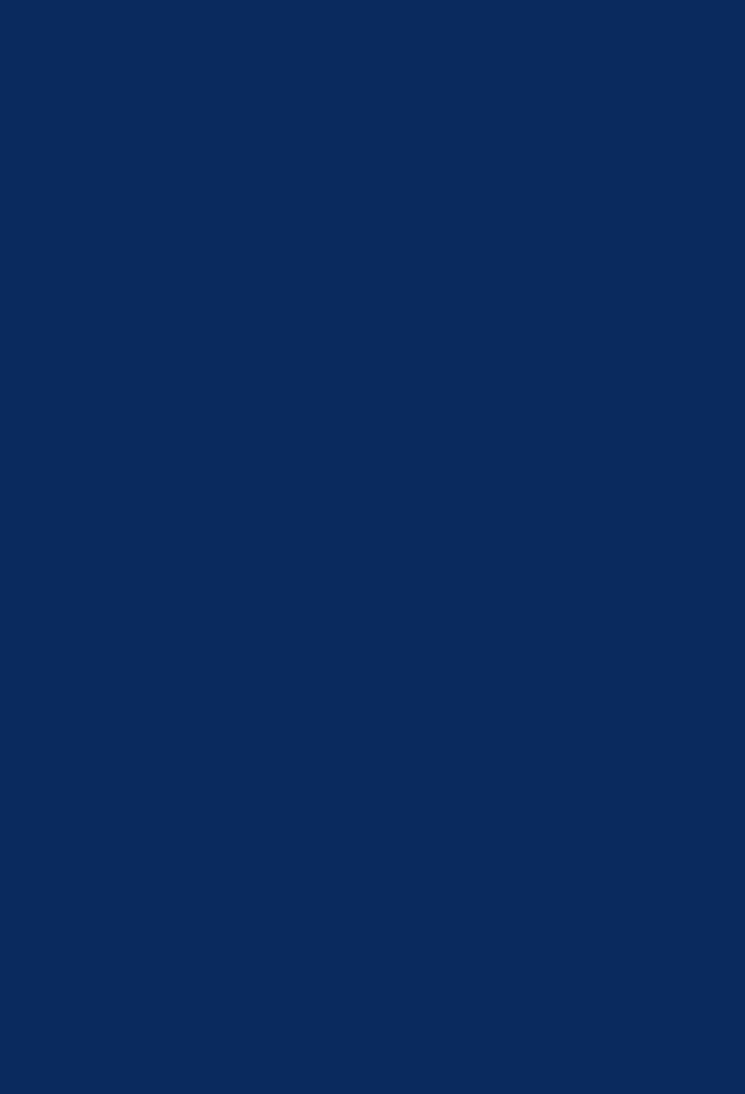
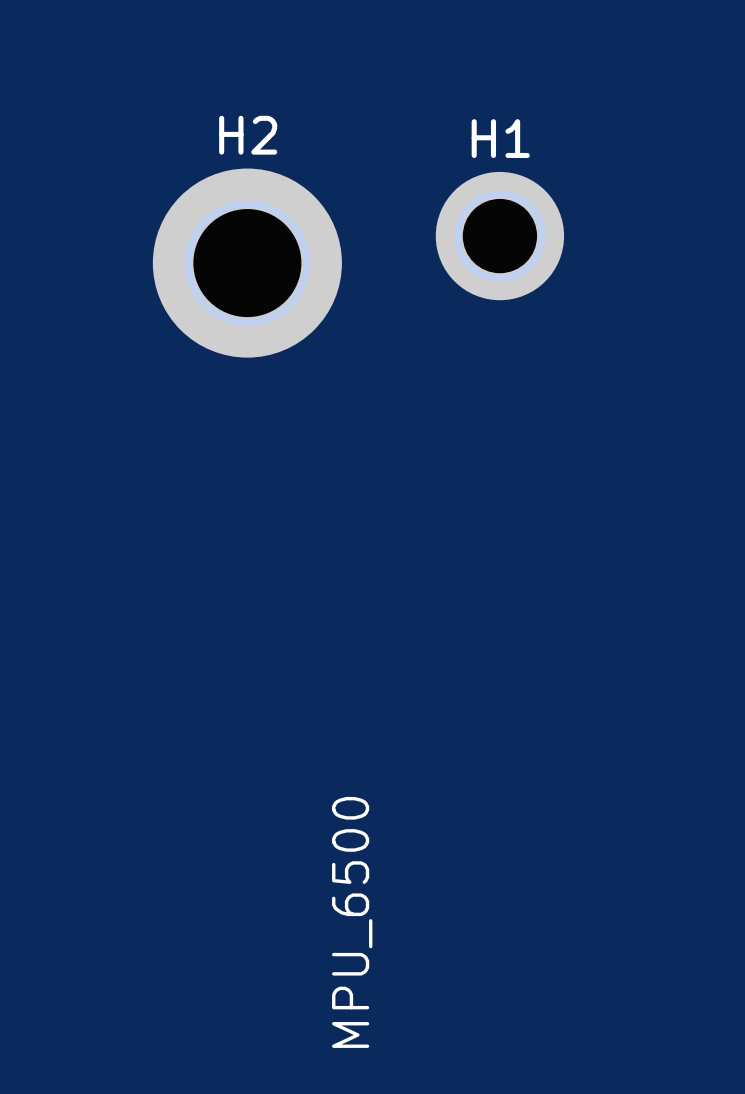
H1: none -> (499, 236)
H2: none -> (247, 263)
text: none -> MPU_6500 (352, 922)

